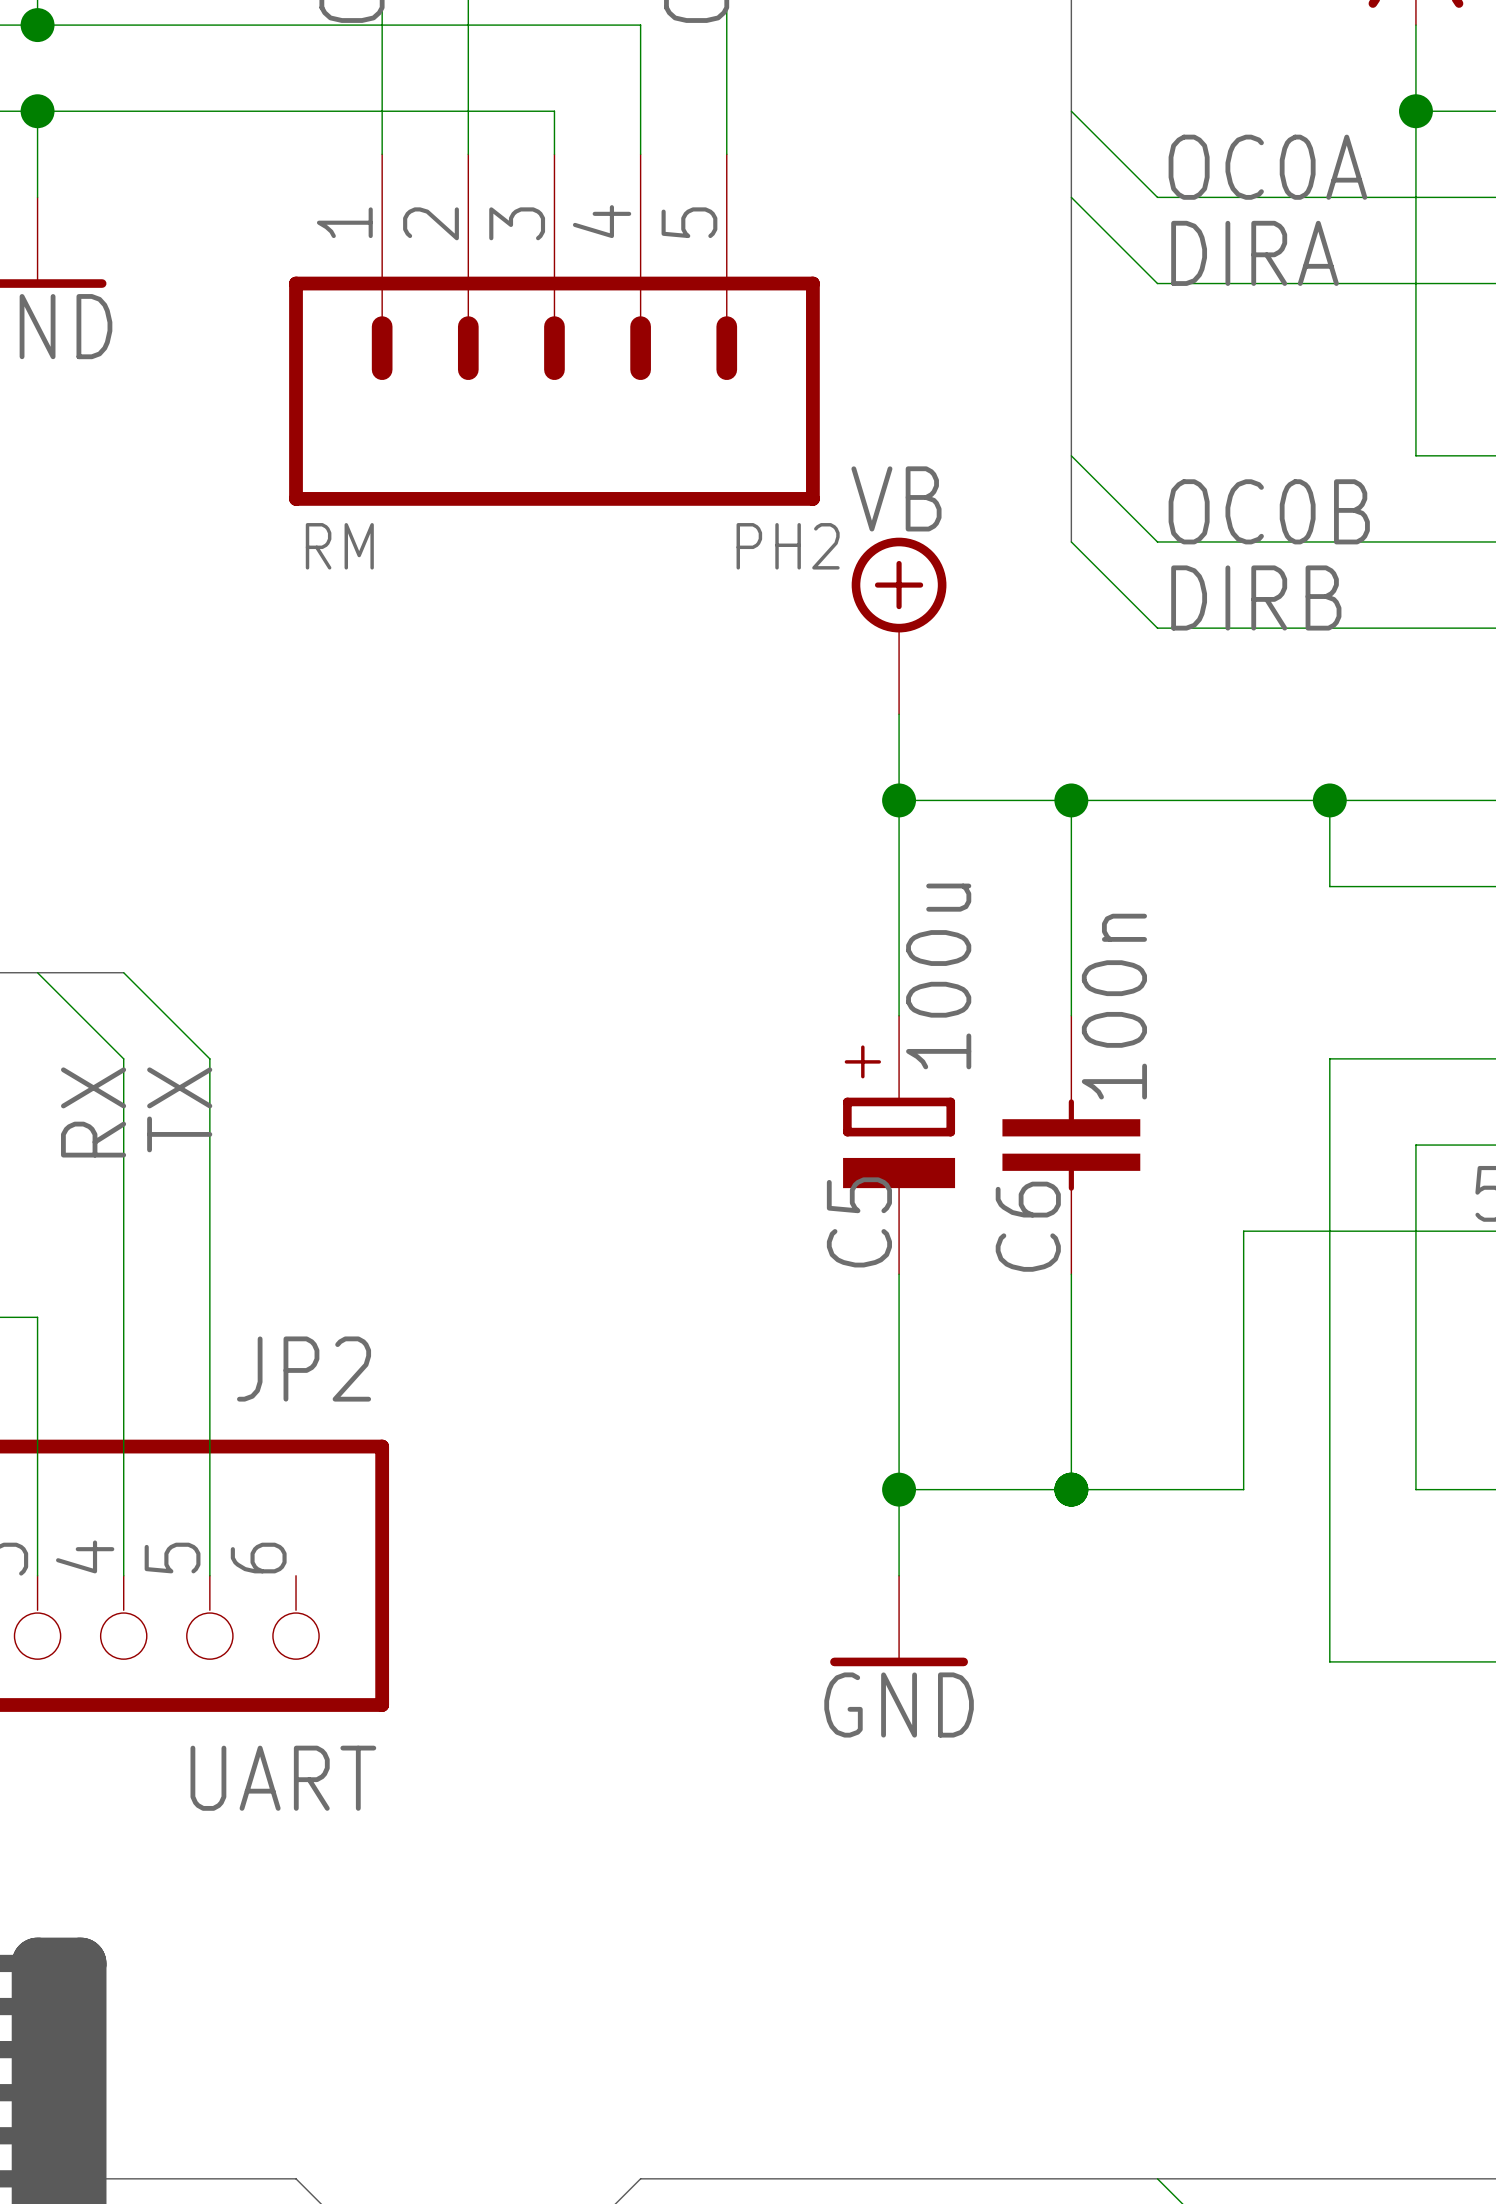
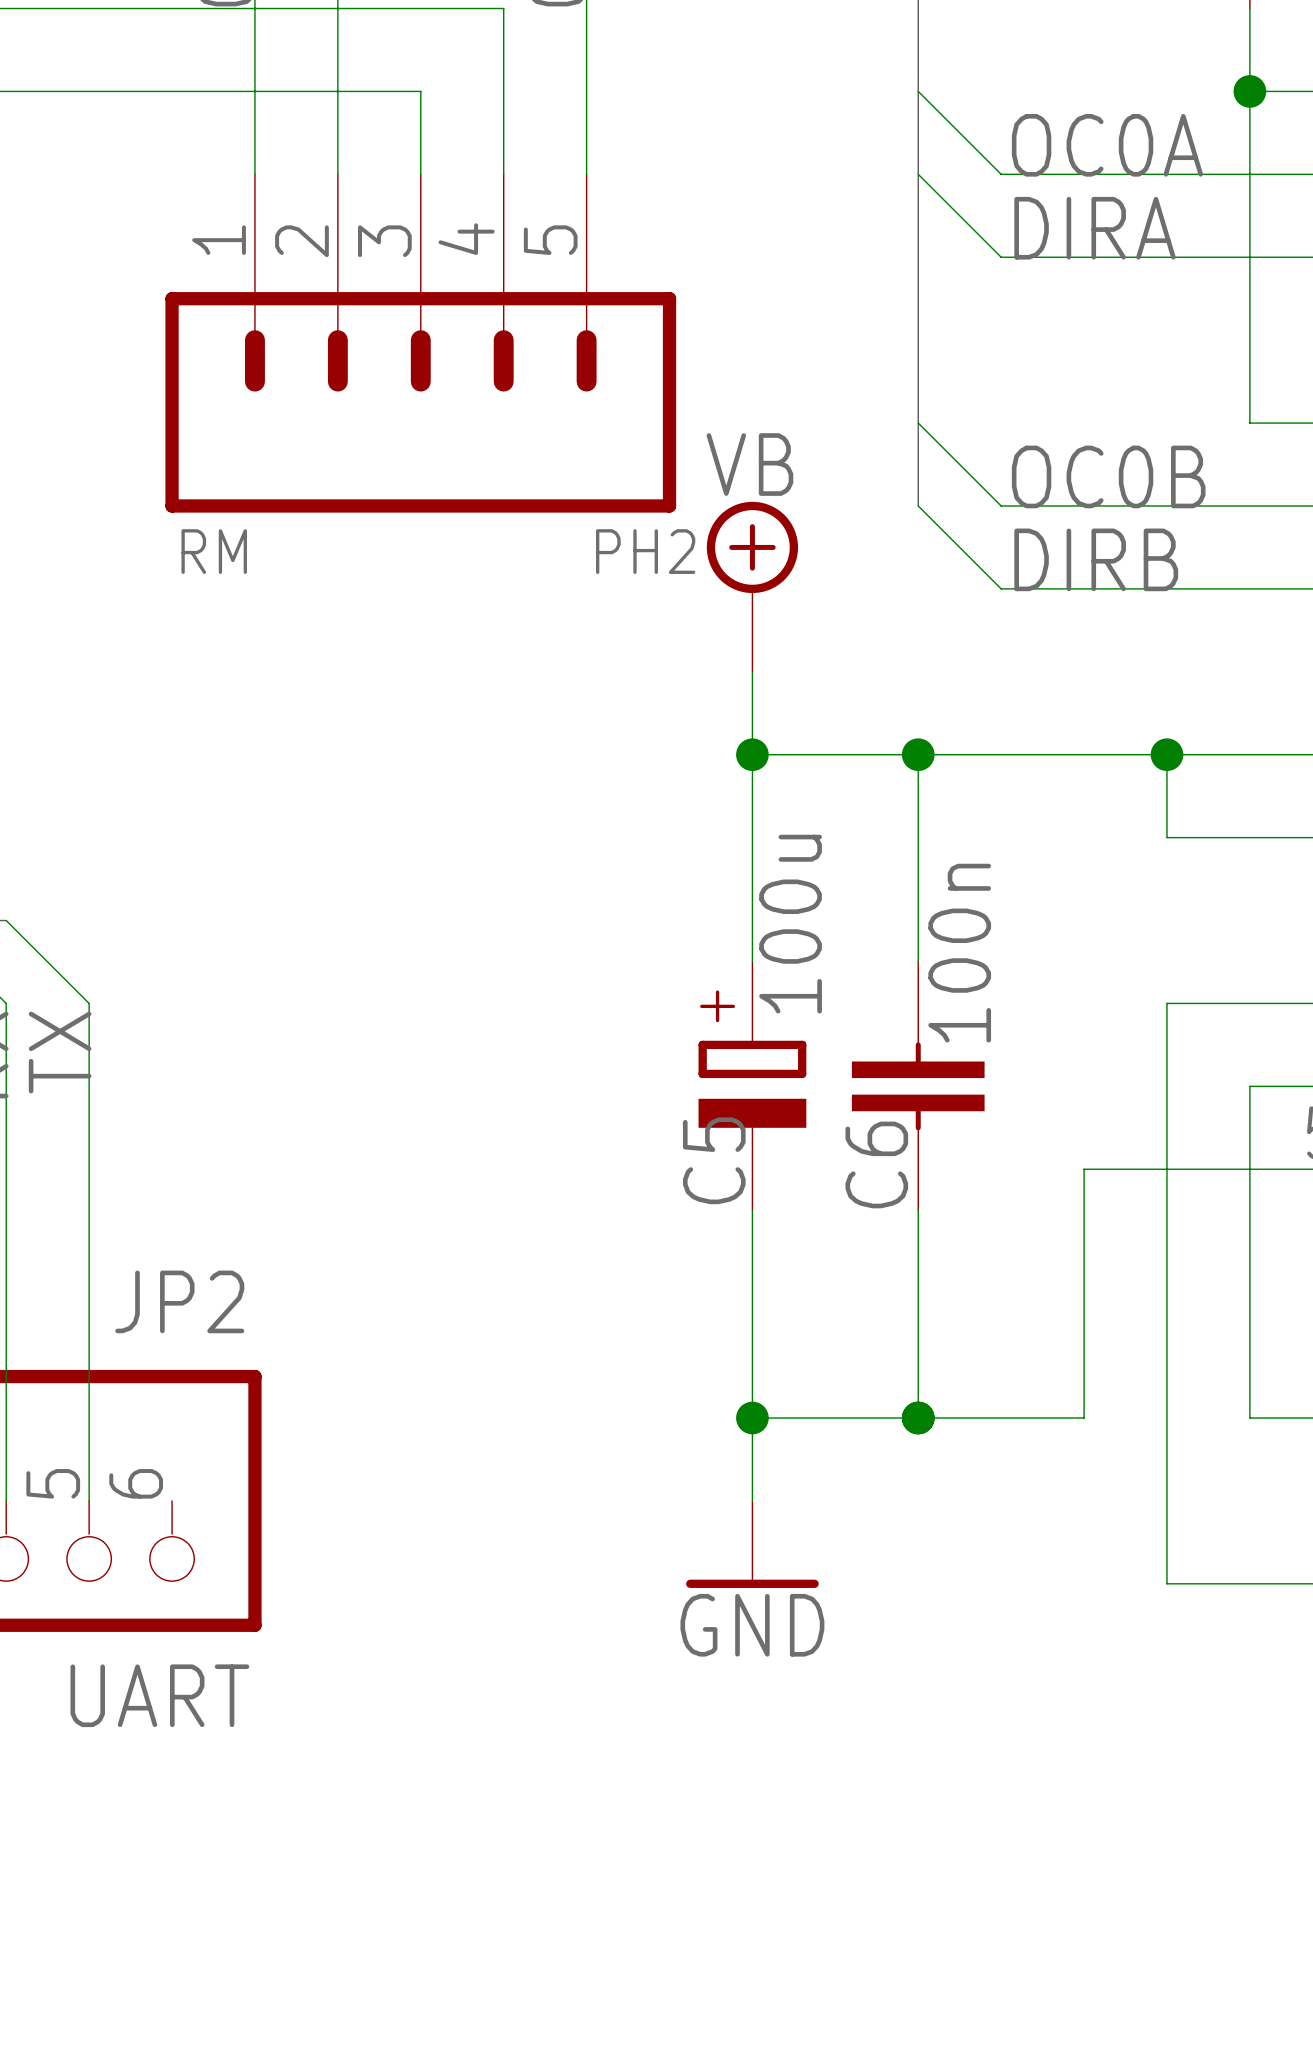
PH2 position: (554, 330) -> (420, 343)

